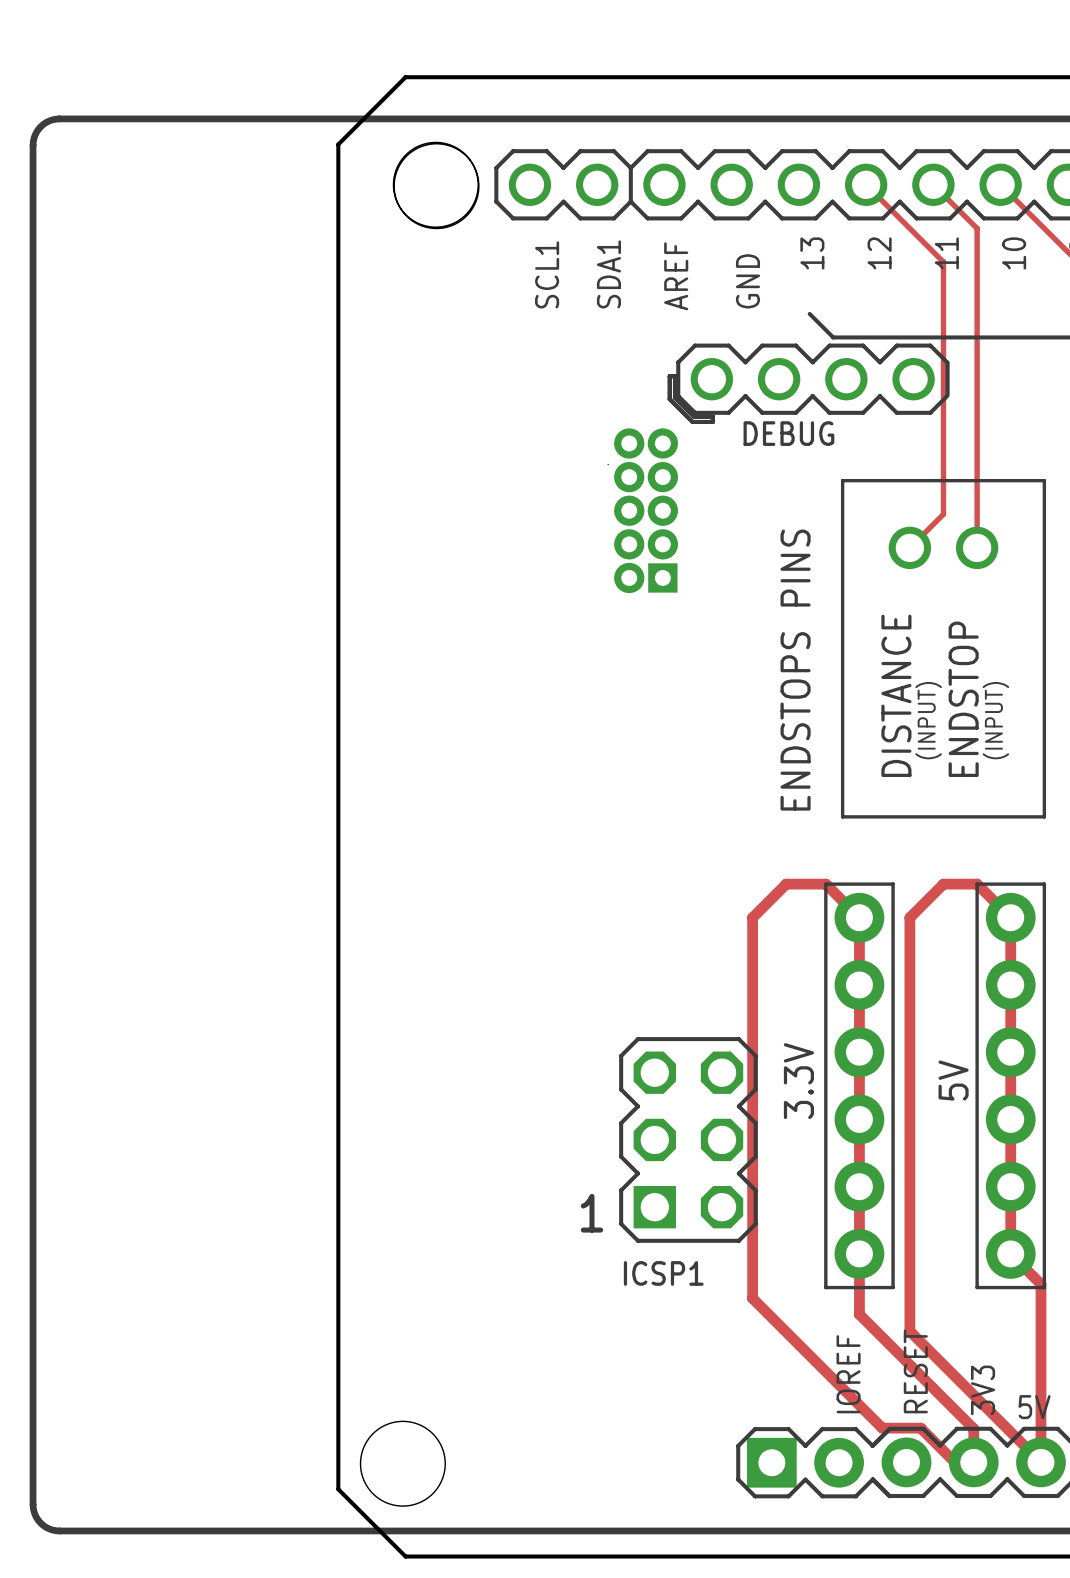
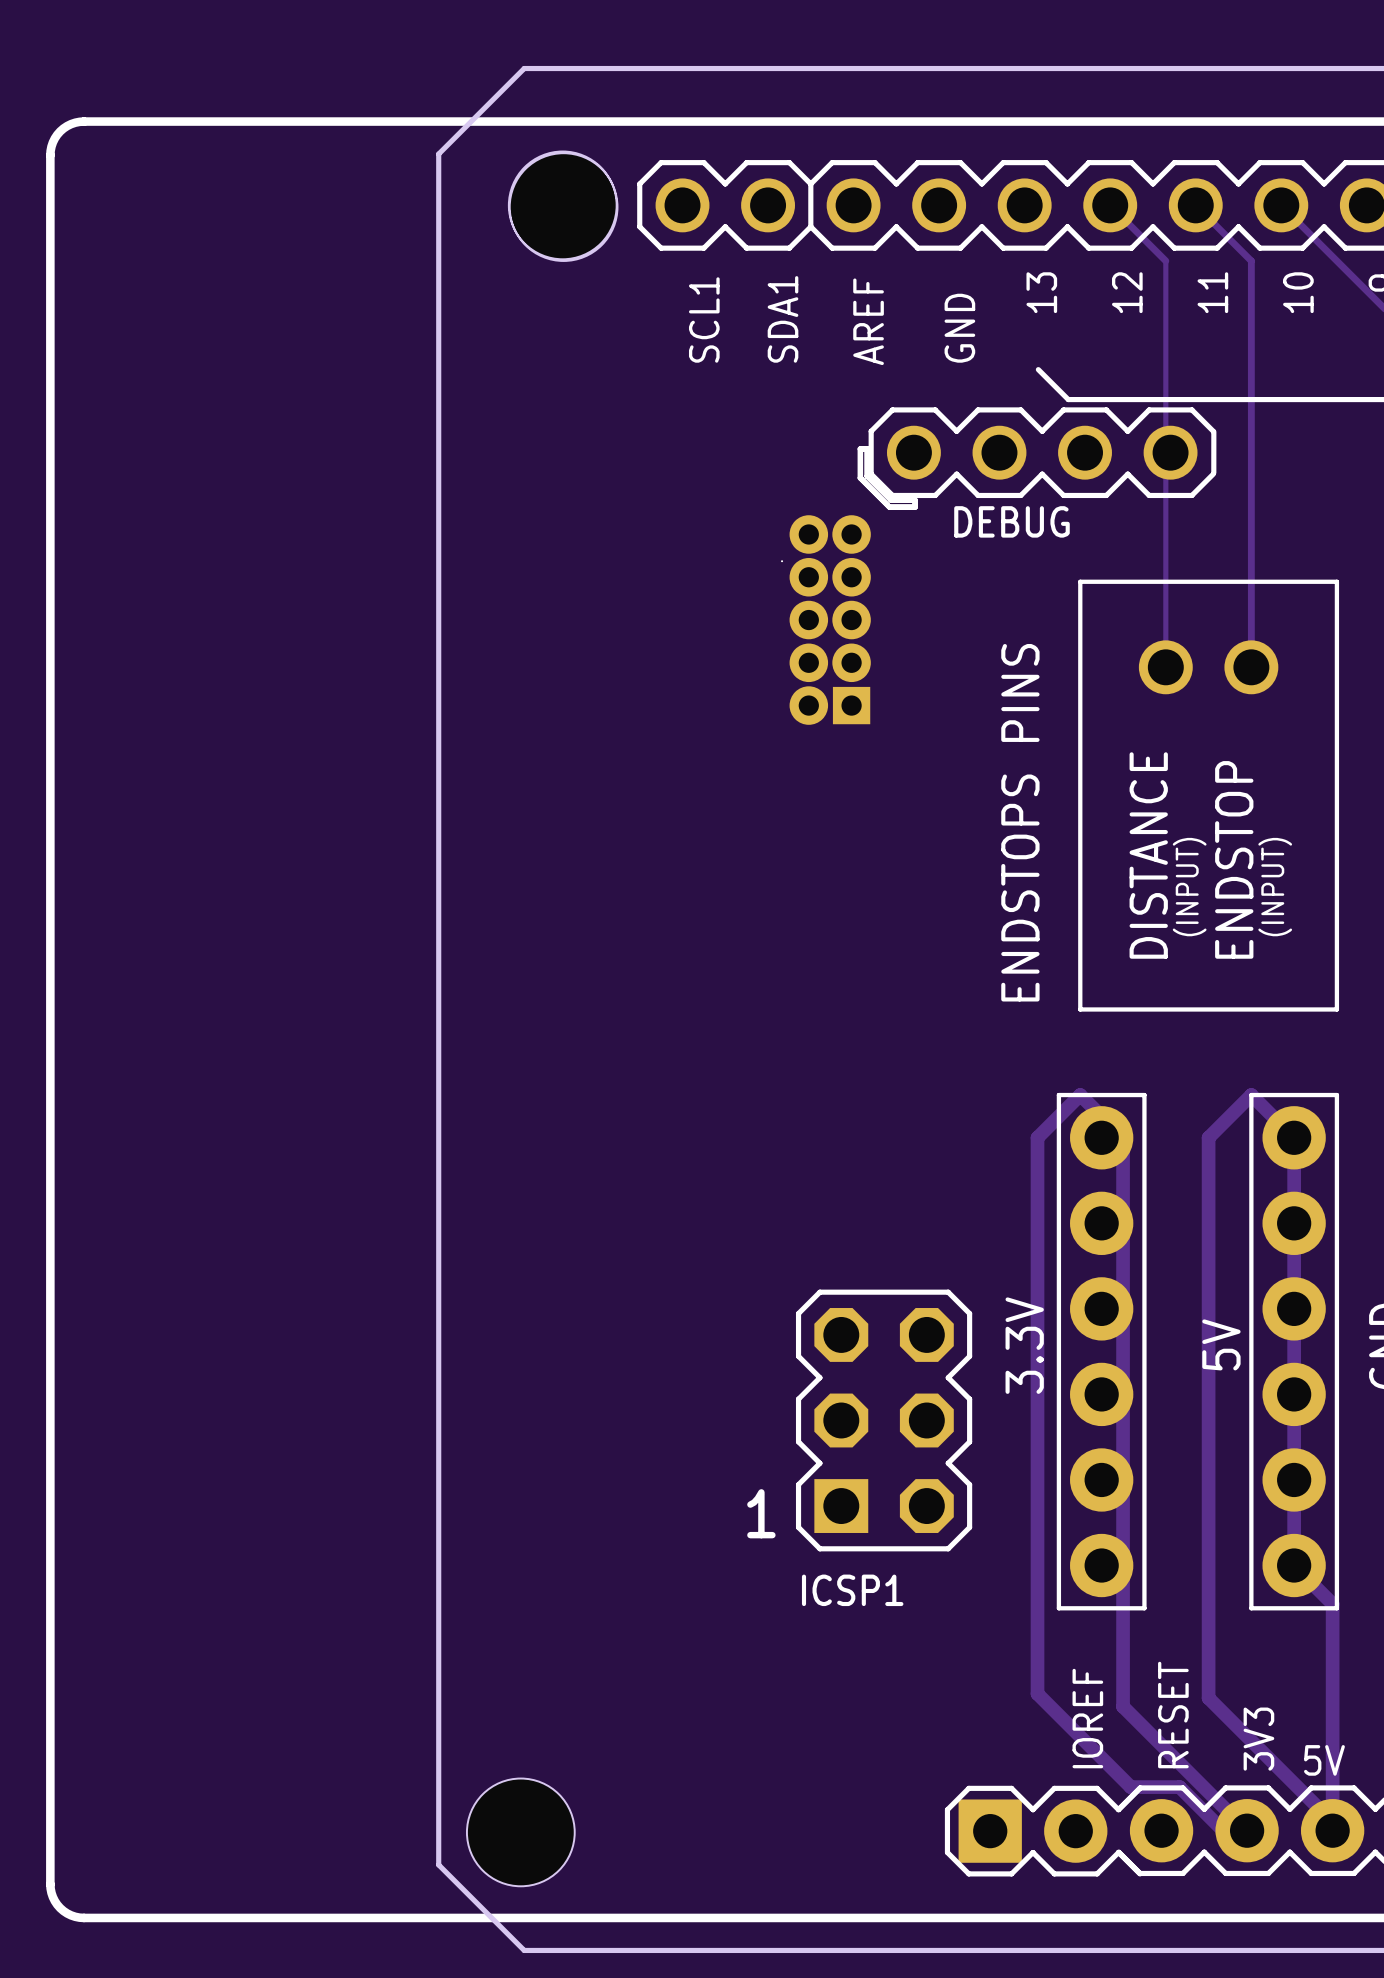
track: (909, 228) (943, 262) (943, 514) (909, 547) -> (1165, 260) (1165, 667)
track: (977, 884) (943, 884) (909, 917) (909, 1331) (1040, 1462) -> (1251, 1095) (1208, 1137) (1208, 1698) (1332, 1822)
track: (809, 1354) (752, 1298) (752, 917) (786, 884) (825, 884) (859, 917) (859, 1314) (973, 1428) (973, 1462) (954, 1462) (953, 1460) -> (1037, 1693) (1037, 1137) (1080, 1095) (1123, 1137) (1123, 1706) (1247, 1830)

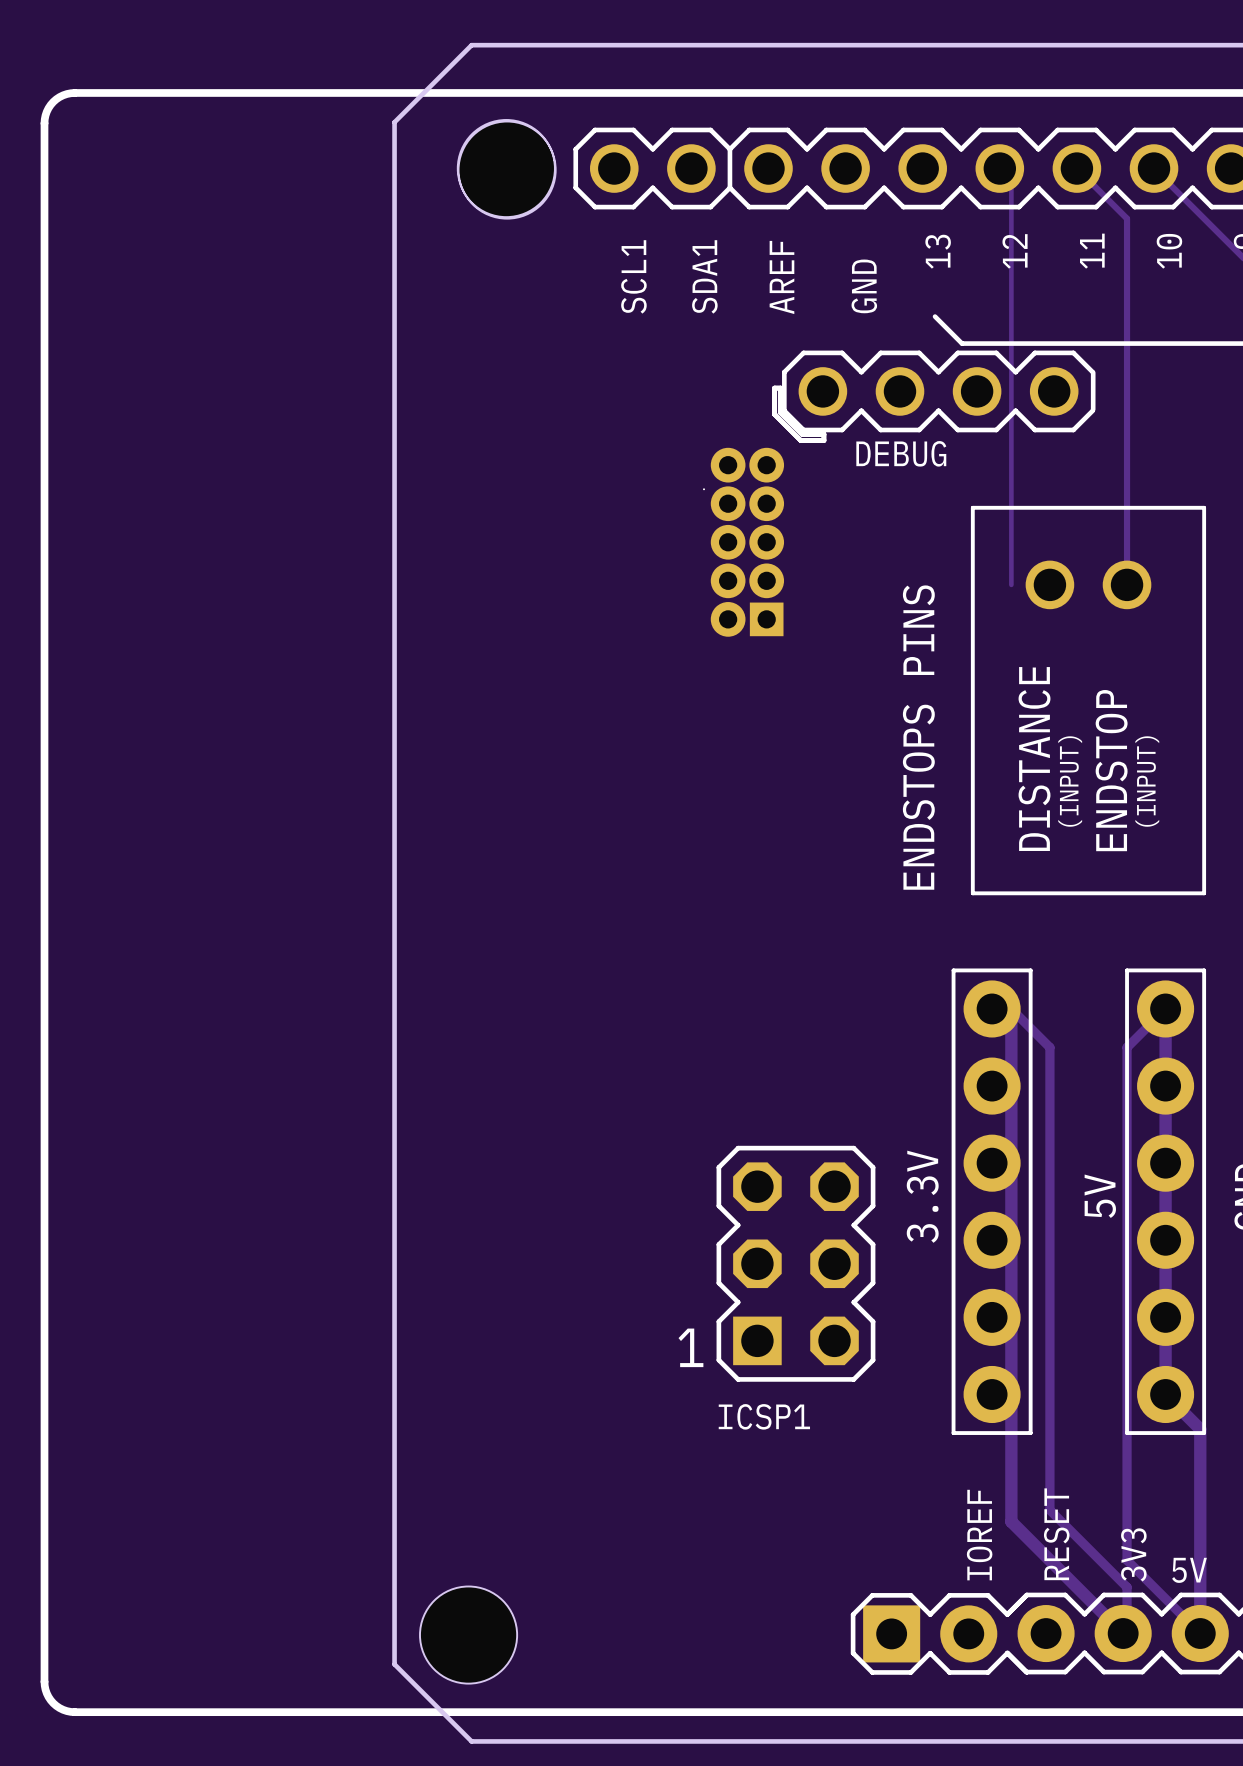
track: (1123, 218) (1165, 260) (1165, 667) -> (1011, 180) (1011, 584)
track: (1123, 1137) (1080, 1095) (1037, 1137) (1037, 1693) (1130, 1787) (1179, 1787) (1221, 1828) -> (1011, 1008) (1049, 1047) (1049, 1510) (1127, 1587) (1127, 1629)
track: (1294, 1137) (1251, 1095) (1208, 1137) (1208, 1698) (1332, 1822) -> (1165, 1008) (1127, 1047) (1127, 1560) (1200, 1633)

